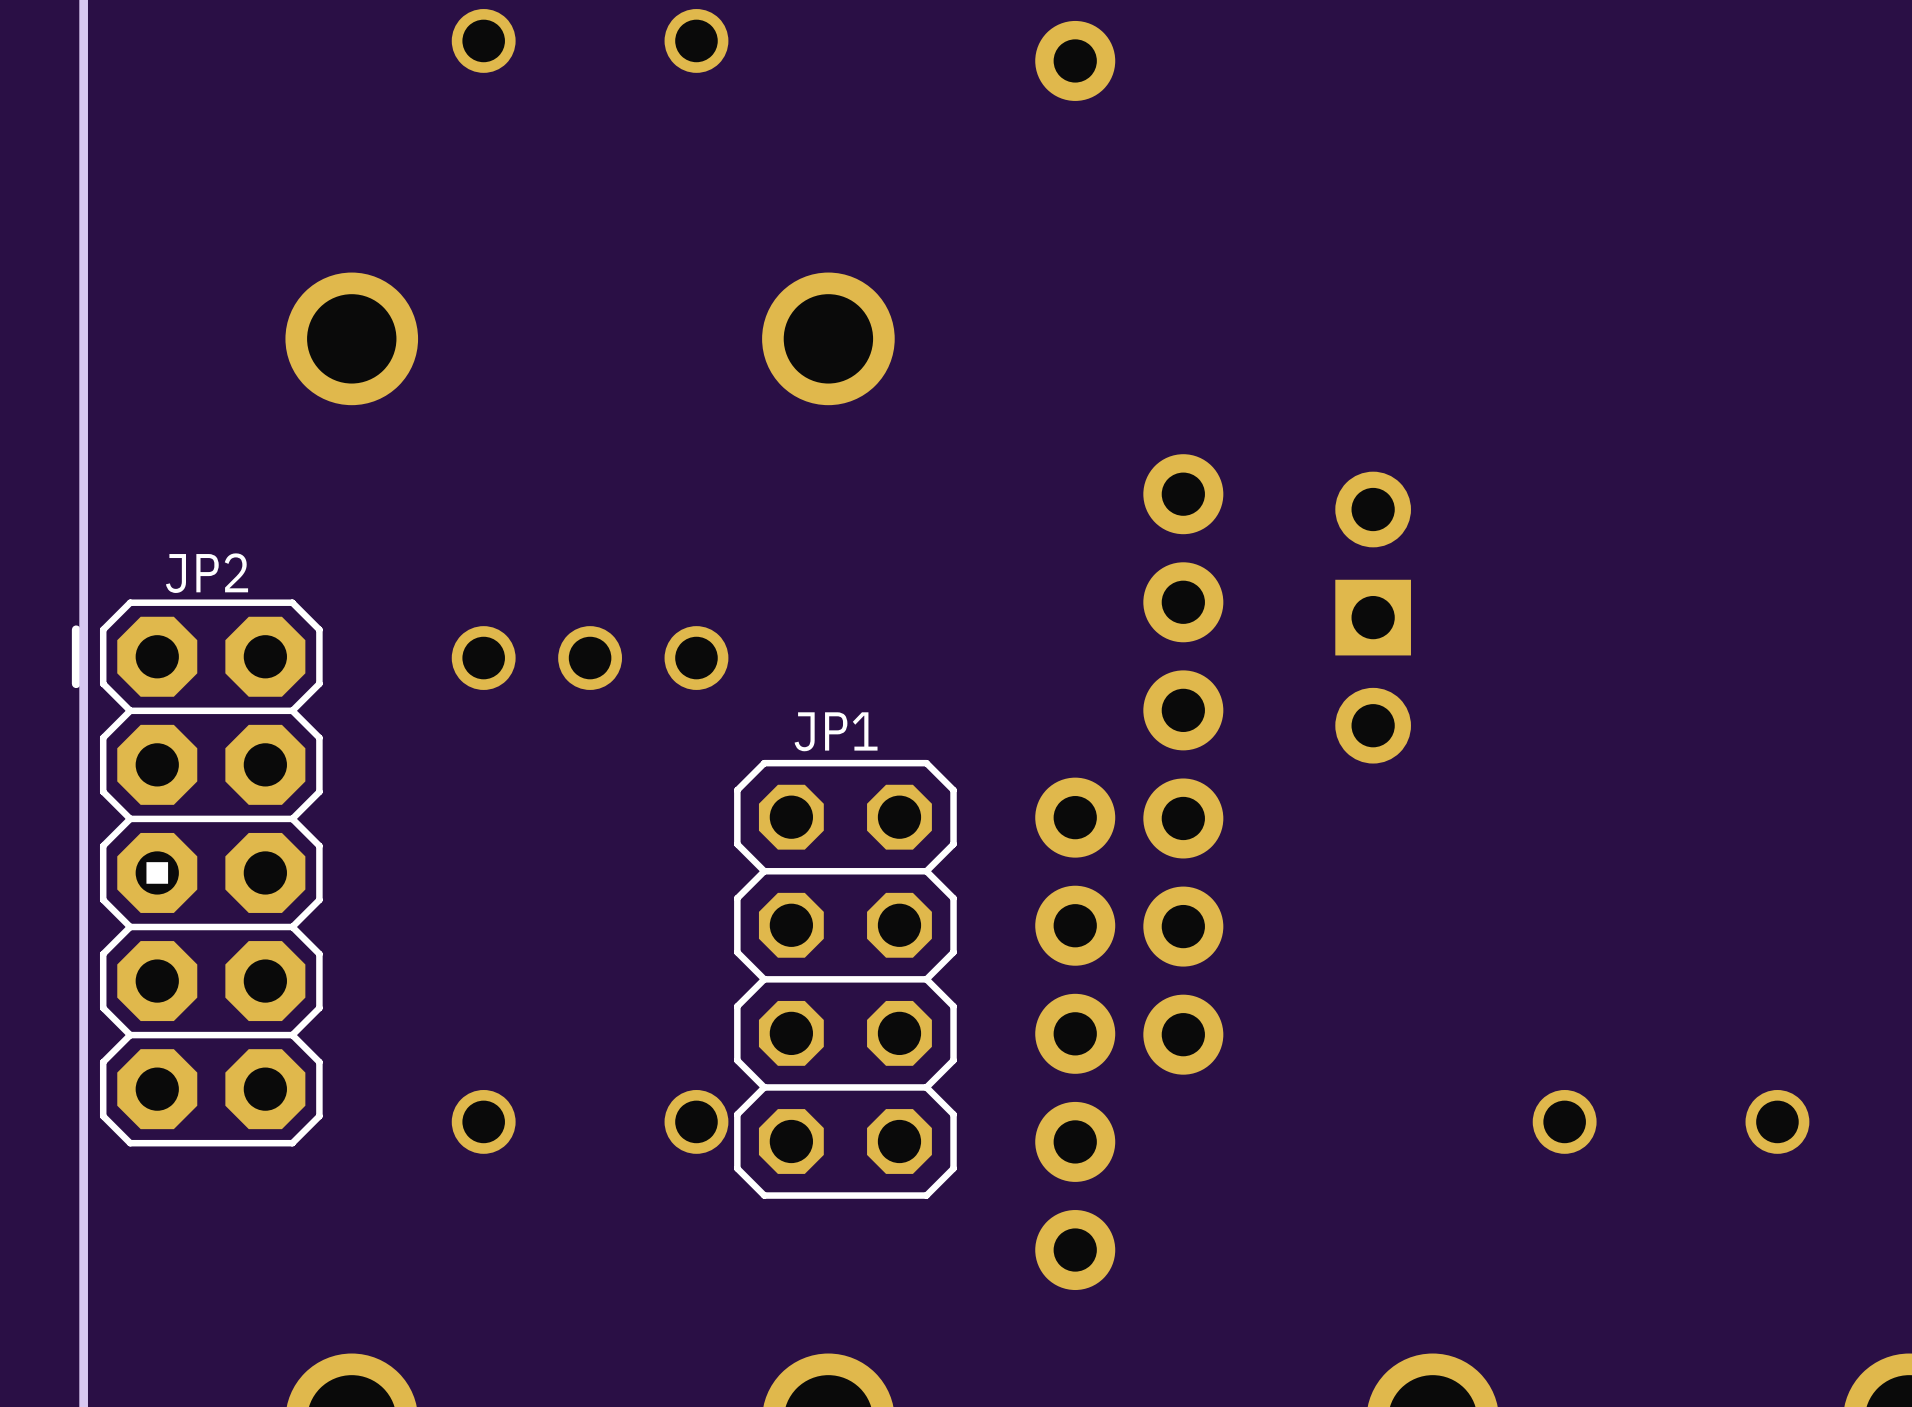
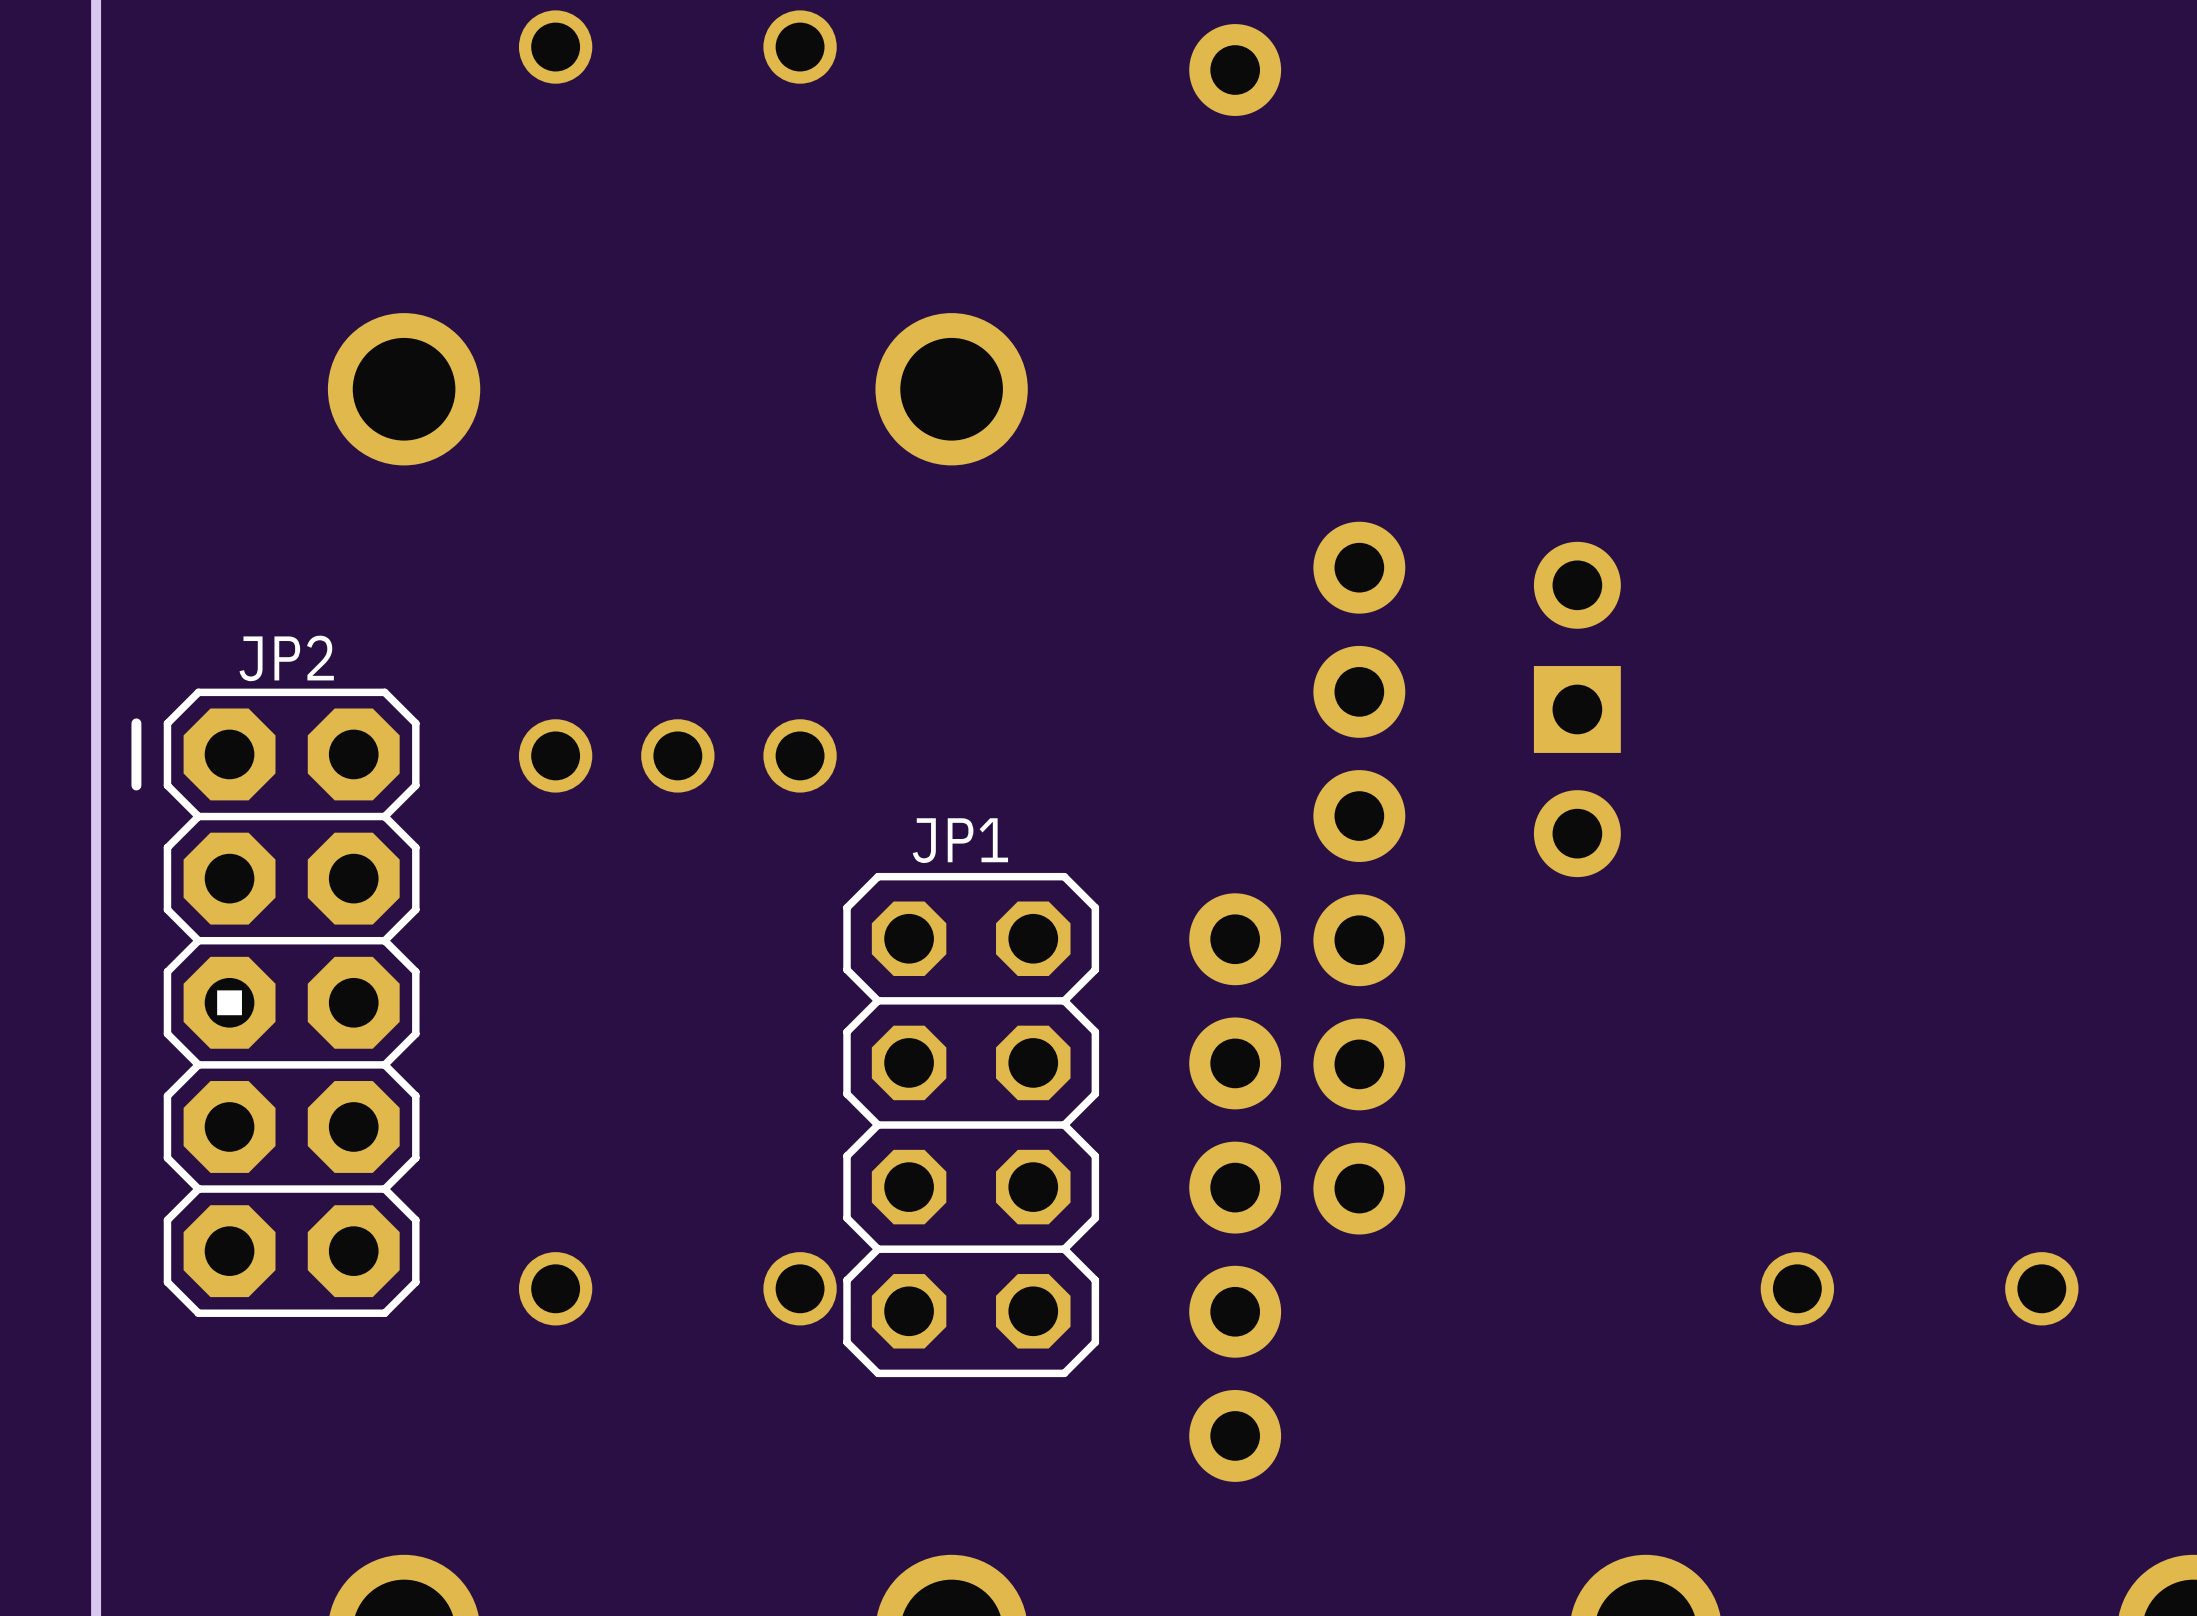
JP2 position: (197, 872) -> (275, 1002)

